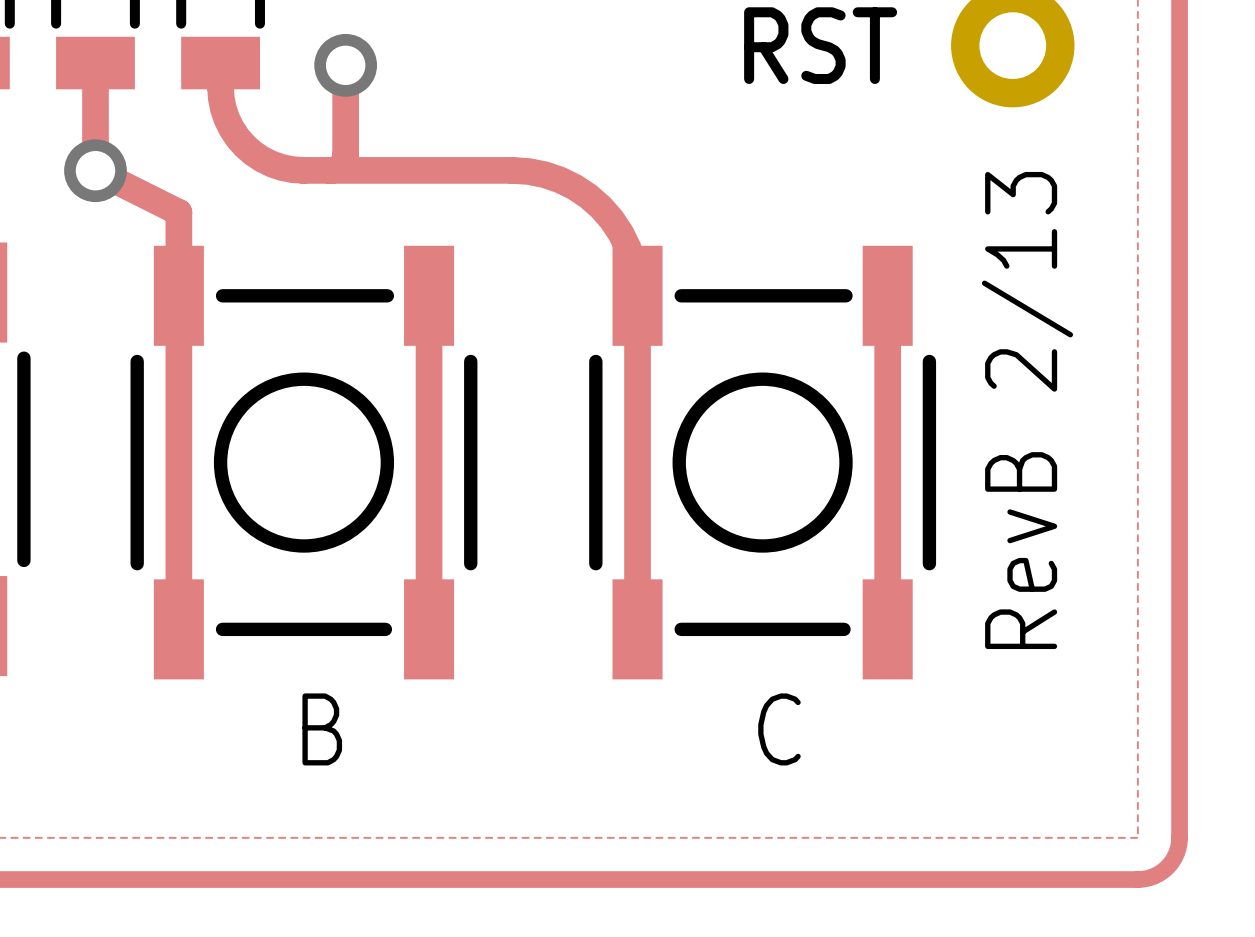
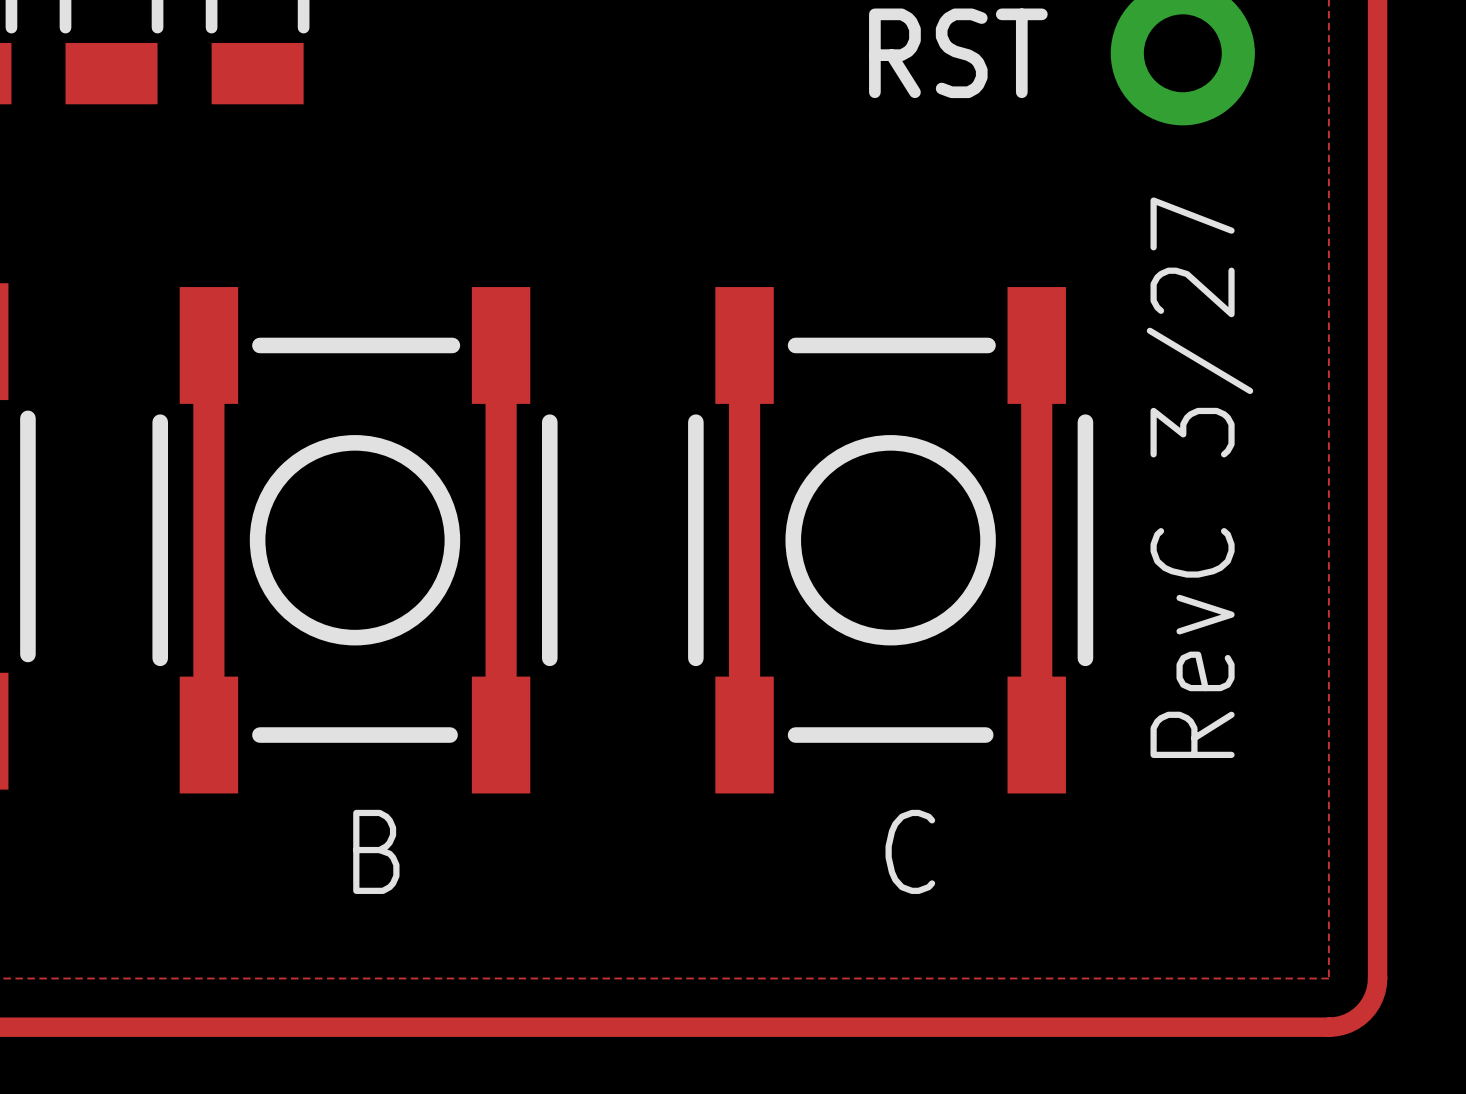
track: (95, 63) (95, 170) (178, 212) (178, 295) -> none
track: (220, 63) (221, 98) (231, 128) (253, 153) (271, 164) (303, 170) (528, 171) (544, 174) (574, 187) (600, 207) (620, 233) (633, 263) (637, 295) -> none
track: (345, 65) (345, 156) (341, 165) (329, 170) -> none
via: (345, 65) -> none
via: (95, 170) -> none
text: RevB 2/13 (1027, 410) -> RevC 3/27 (1199, 477)

